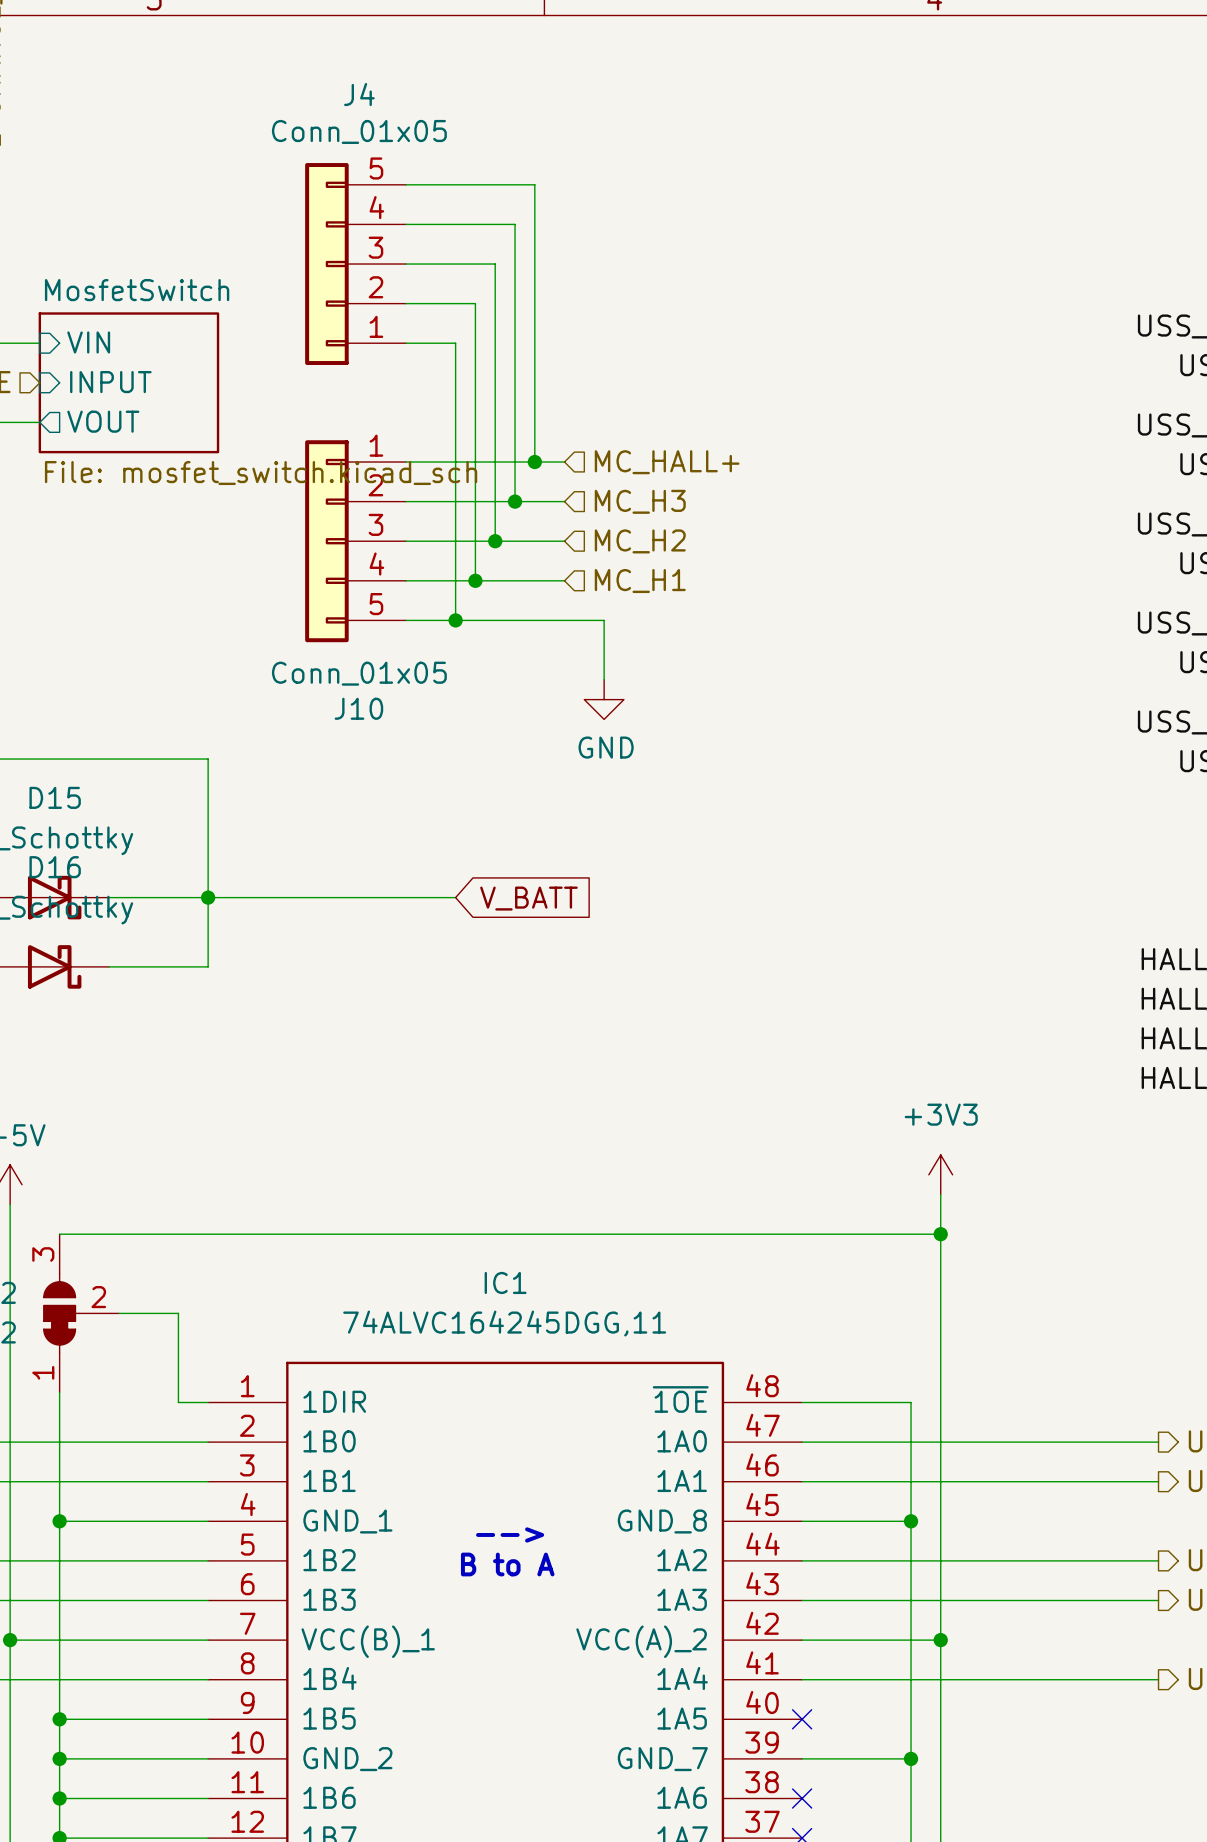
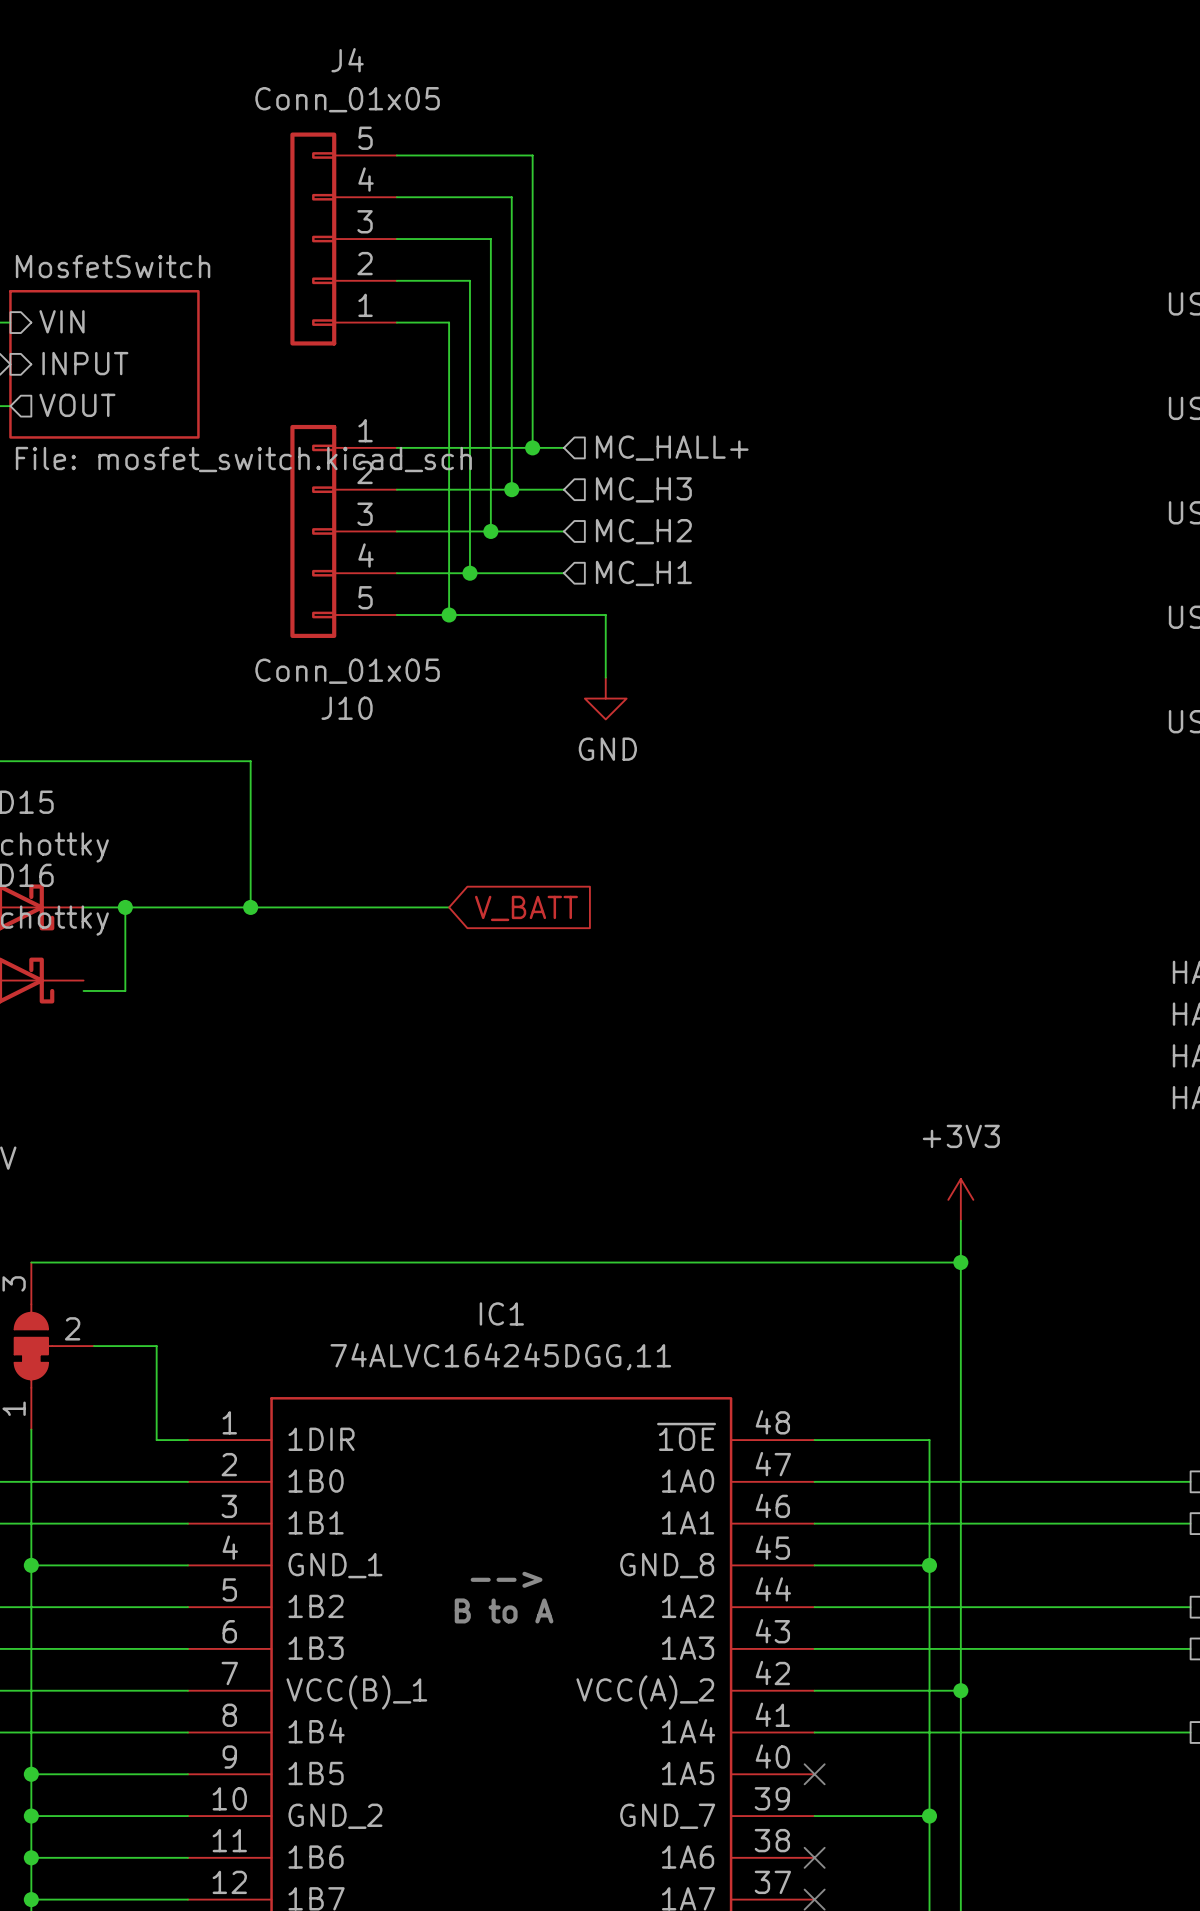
wire: (208, 759) (208, 966) (109, 966) -> (188, 761) (250, 761) (250, 907)
wire: none -> (125, 907) (125, 990) (83, 990)
junction: none -> (125, 907)
junction: (208, 897) -> none
junction: none -> (250, 907)

